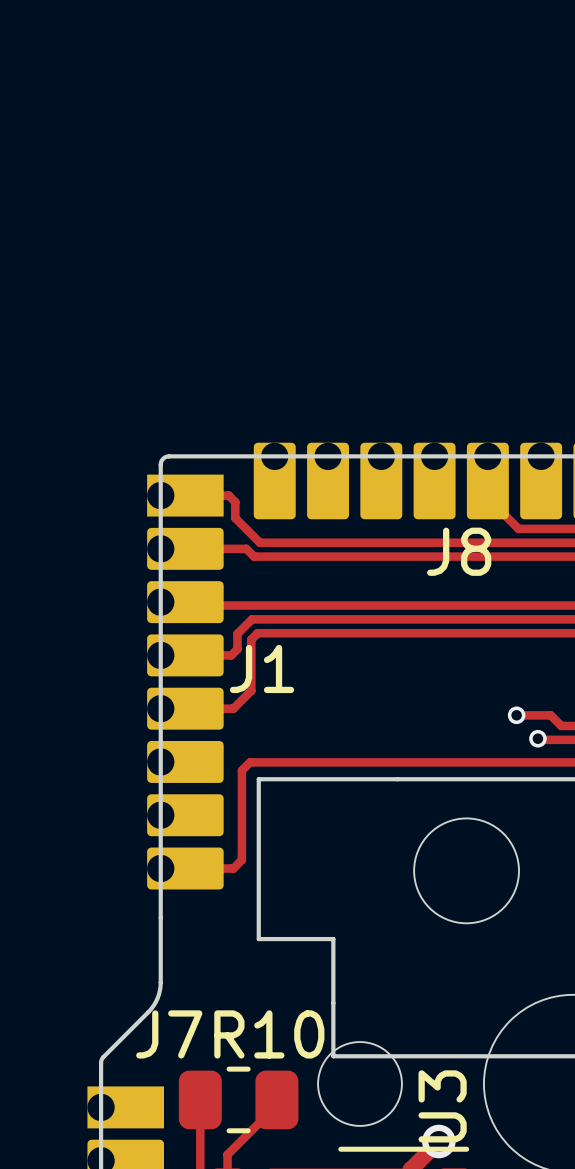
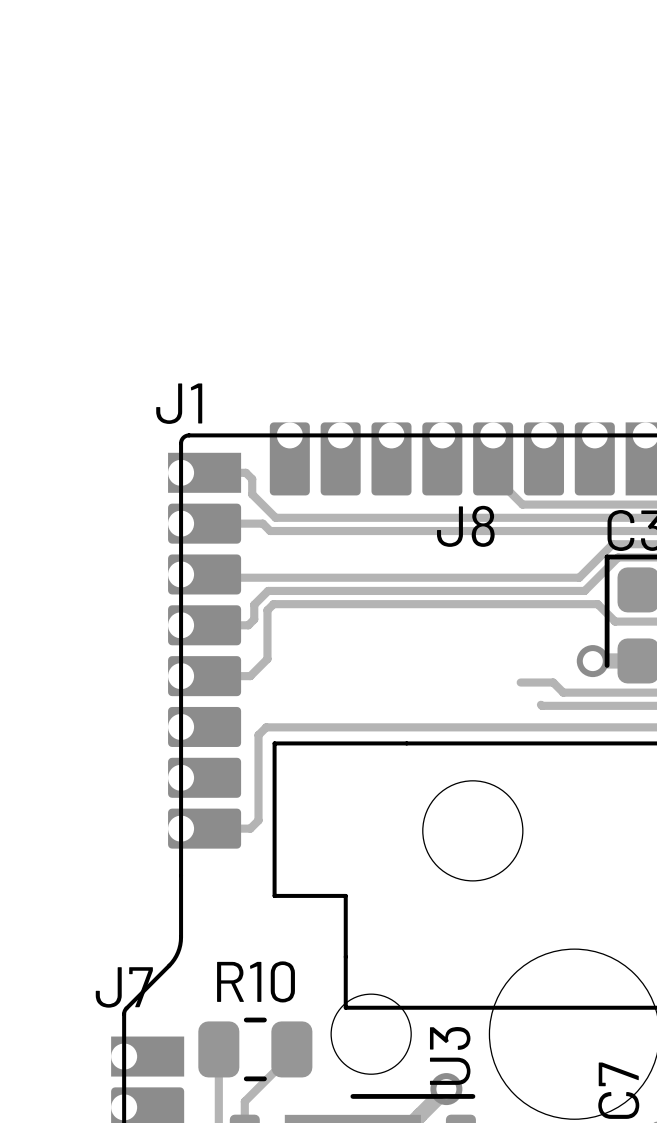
J1 name position: J1 (262, 668) -> J1 (179, 403)
via: (516, 715) -> none
via: (537, 738) -> none
J7 name position: J7 (169, 1034) -> J7 (124, 987)
R10 name position: R10 (269, 1034) -> R10 (256, 981)

